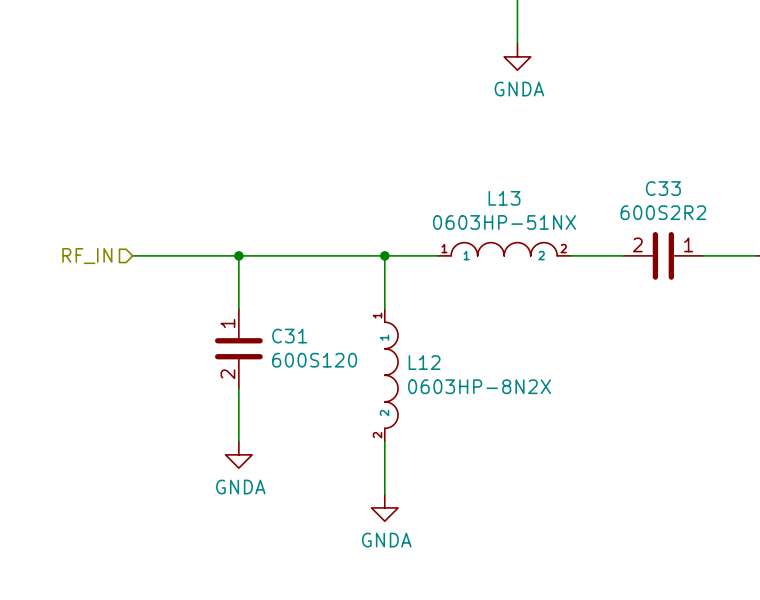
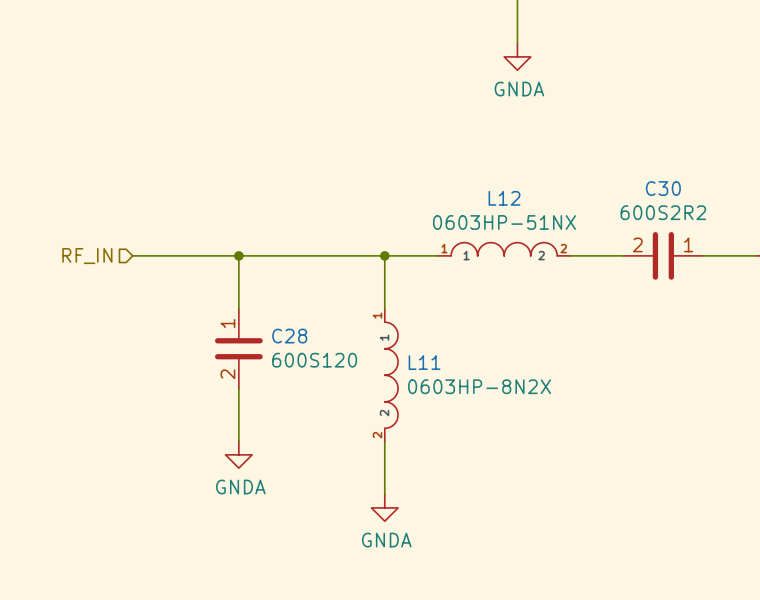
C33 name: C33 (663, 188) -> C30 (663, 188)
L13 name: L13 (504, 198) -> L12 (504, 198)
C31 name: C31 (289, 336) -> C28 (289, 336)
L12 name: L12 (424, 362) -> L11 (424, 362)

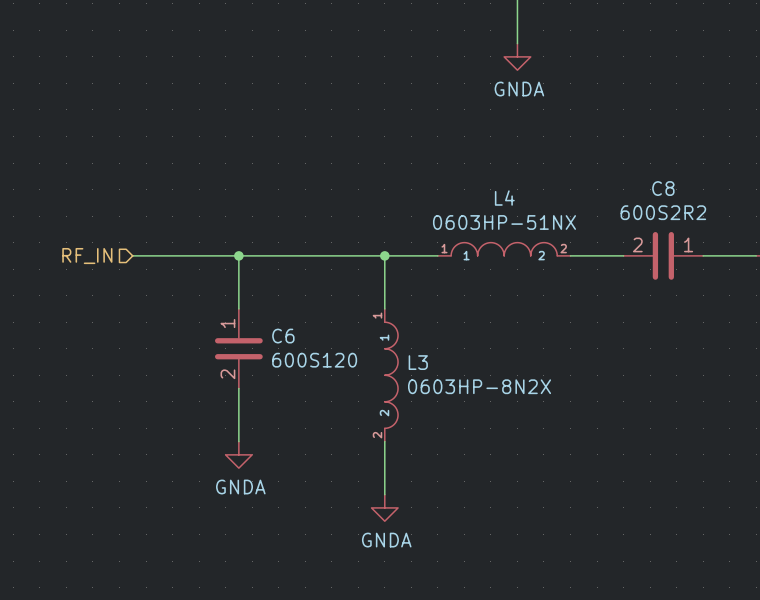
C30 name: C30 (663, 188) -> C8 (663, 188)
L12 name: L12 (504, 198) -> L4 (504, 198)
C28 name: C28 (289, 336) -> C6 (283, 336)
L11 name: L11 (424, 362) -> L3 (418, 362)

